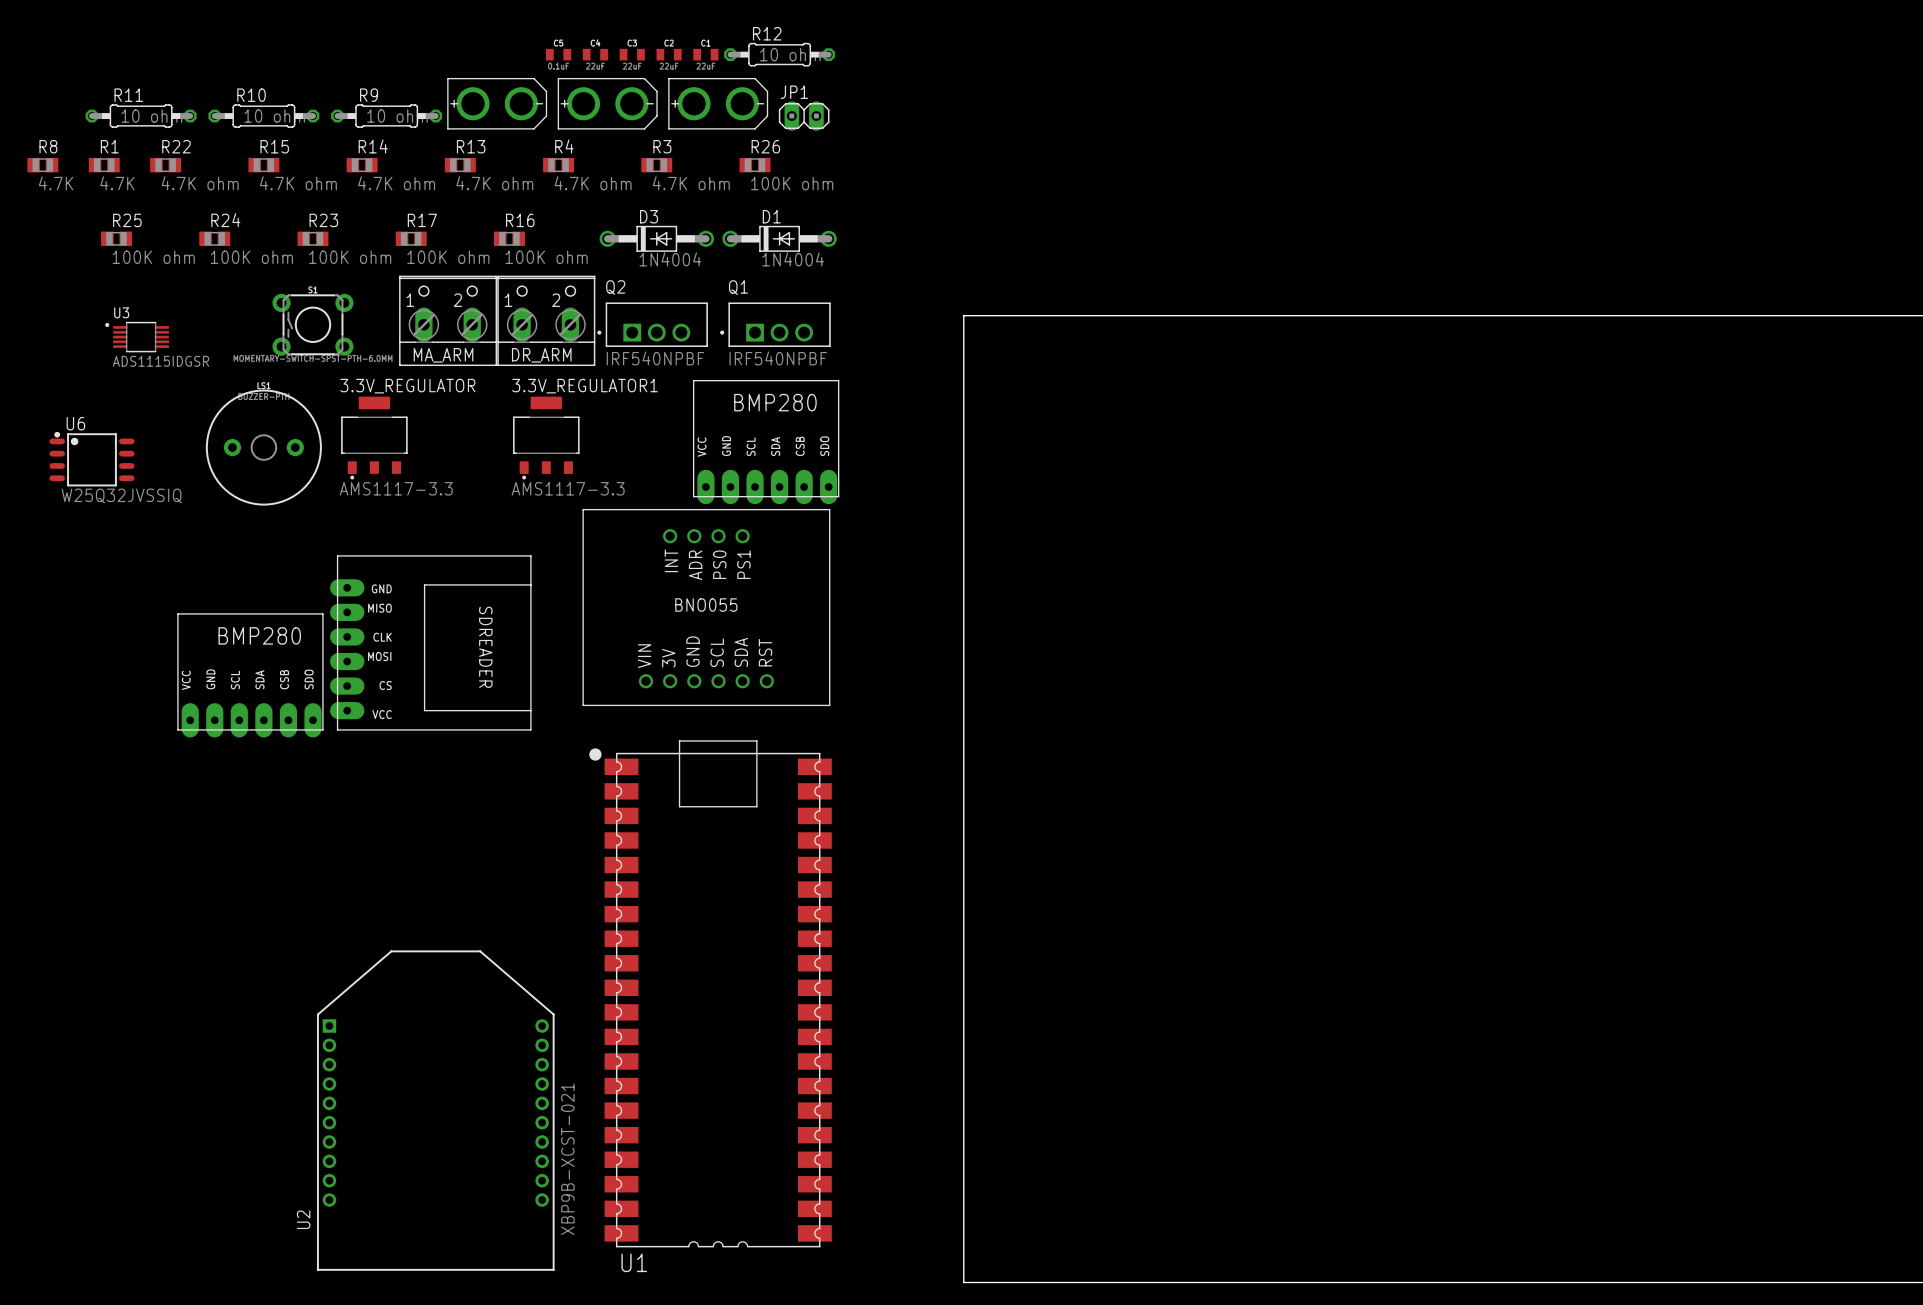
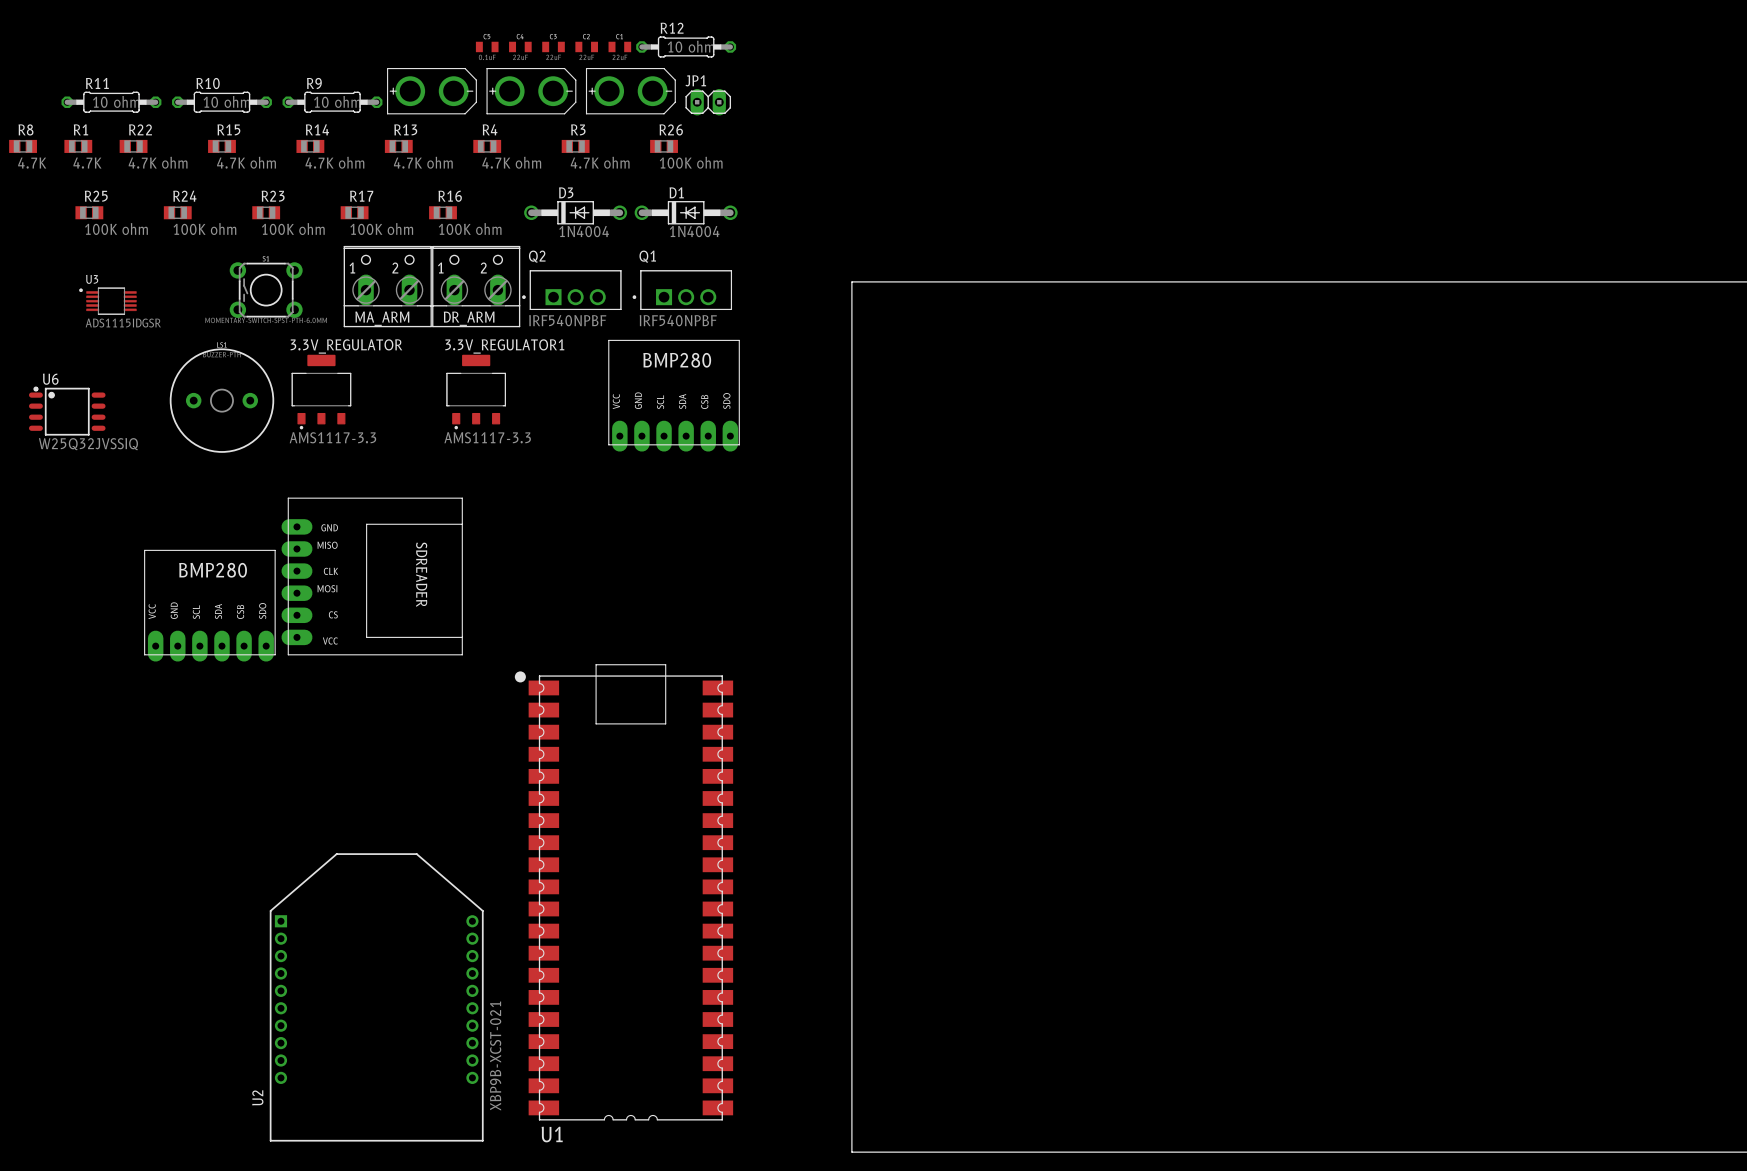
part: (706, 607) -> none

